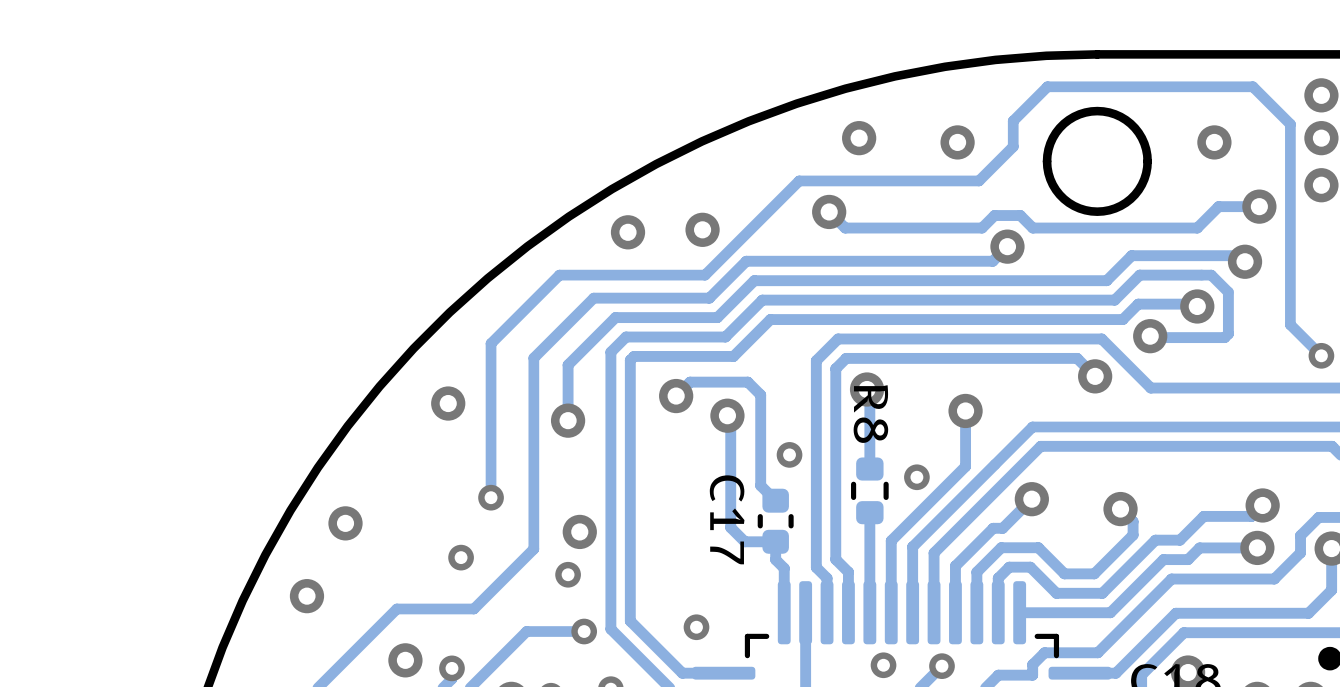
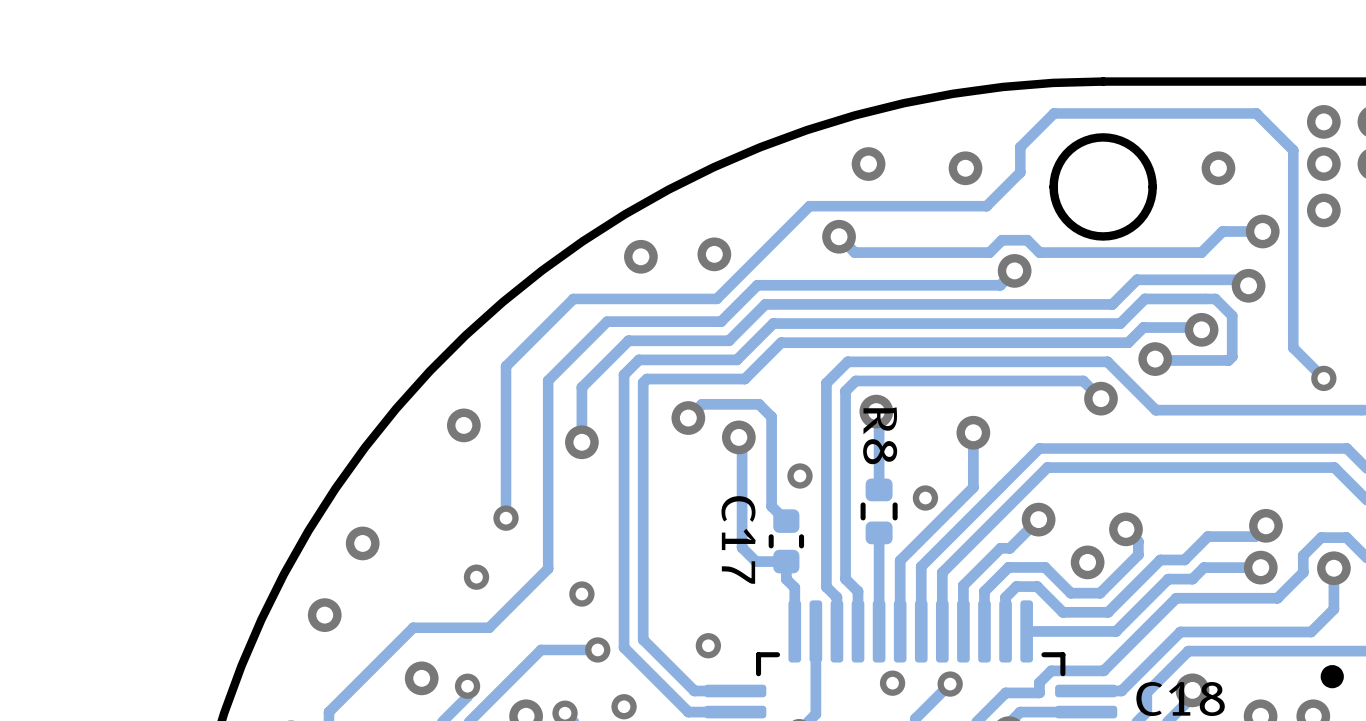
via: (579, 531) -> none
via: none -> (1087, 562)

